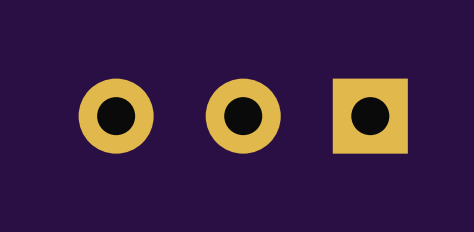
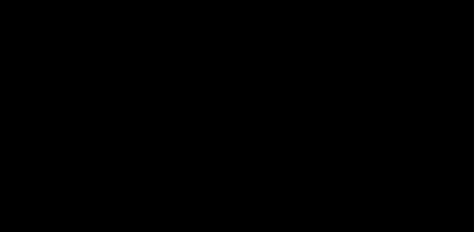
part: (243, 116) -> none

